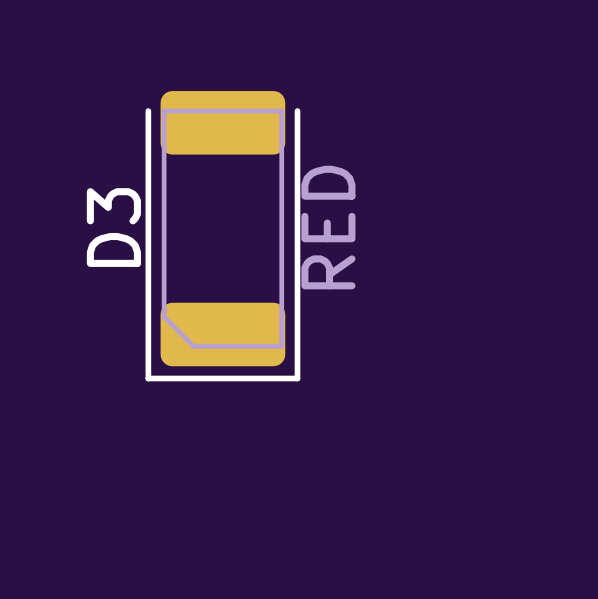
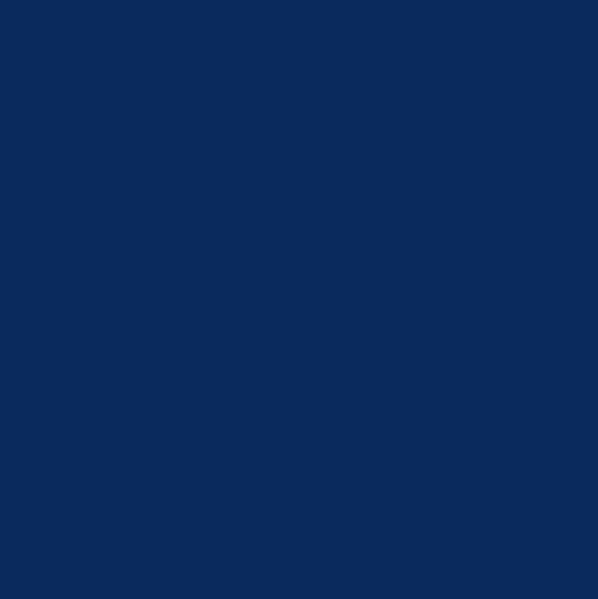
D3: RED (222, 236) -> none

